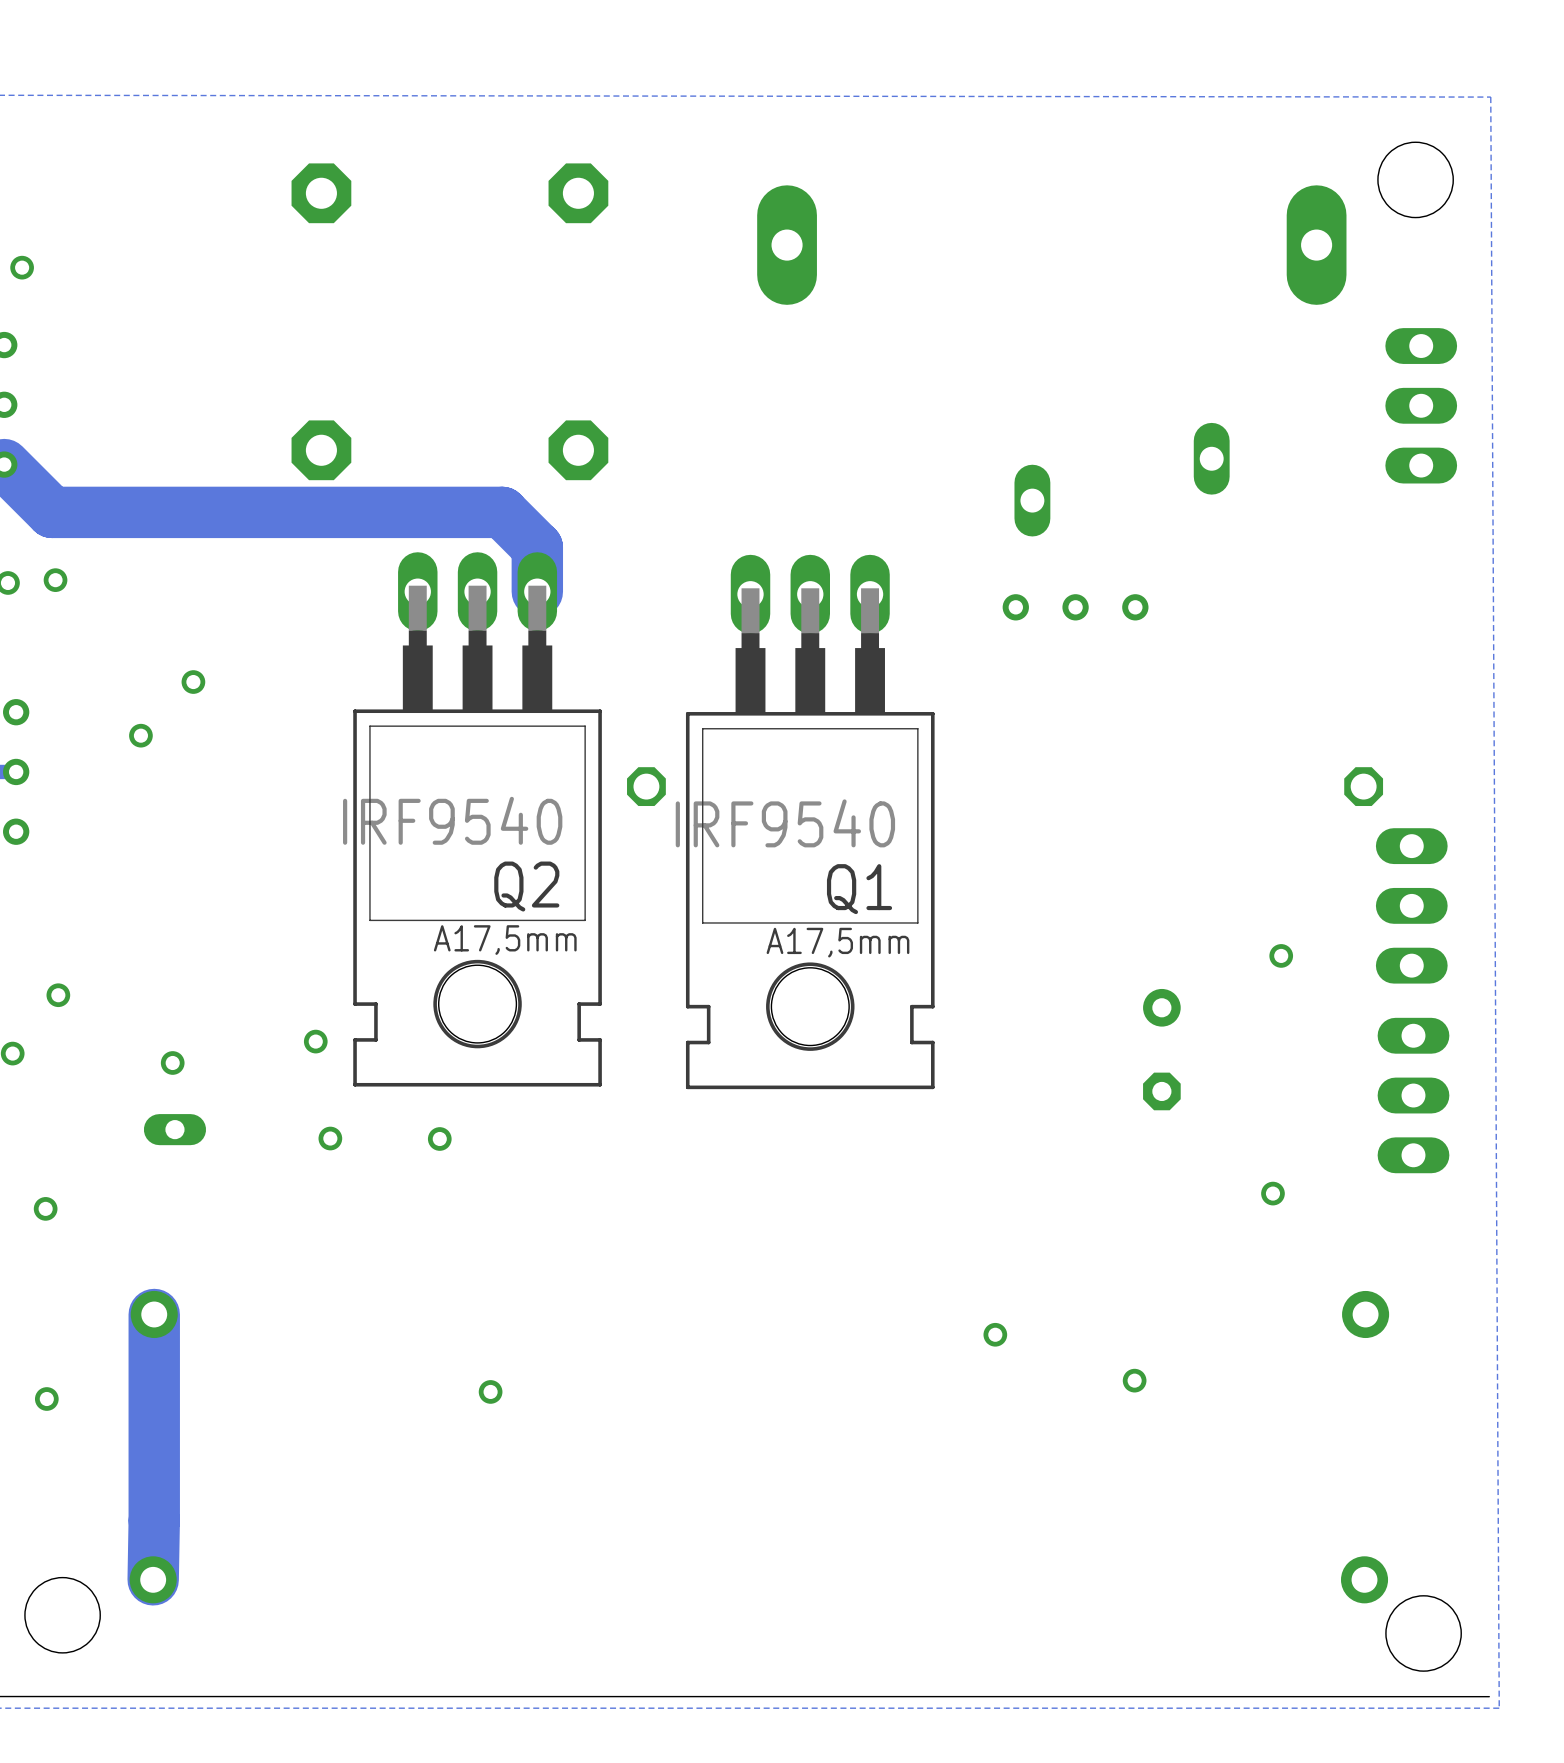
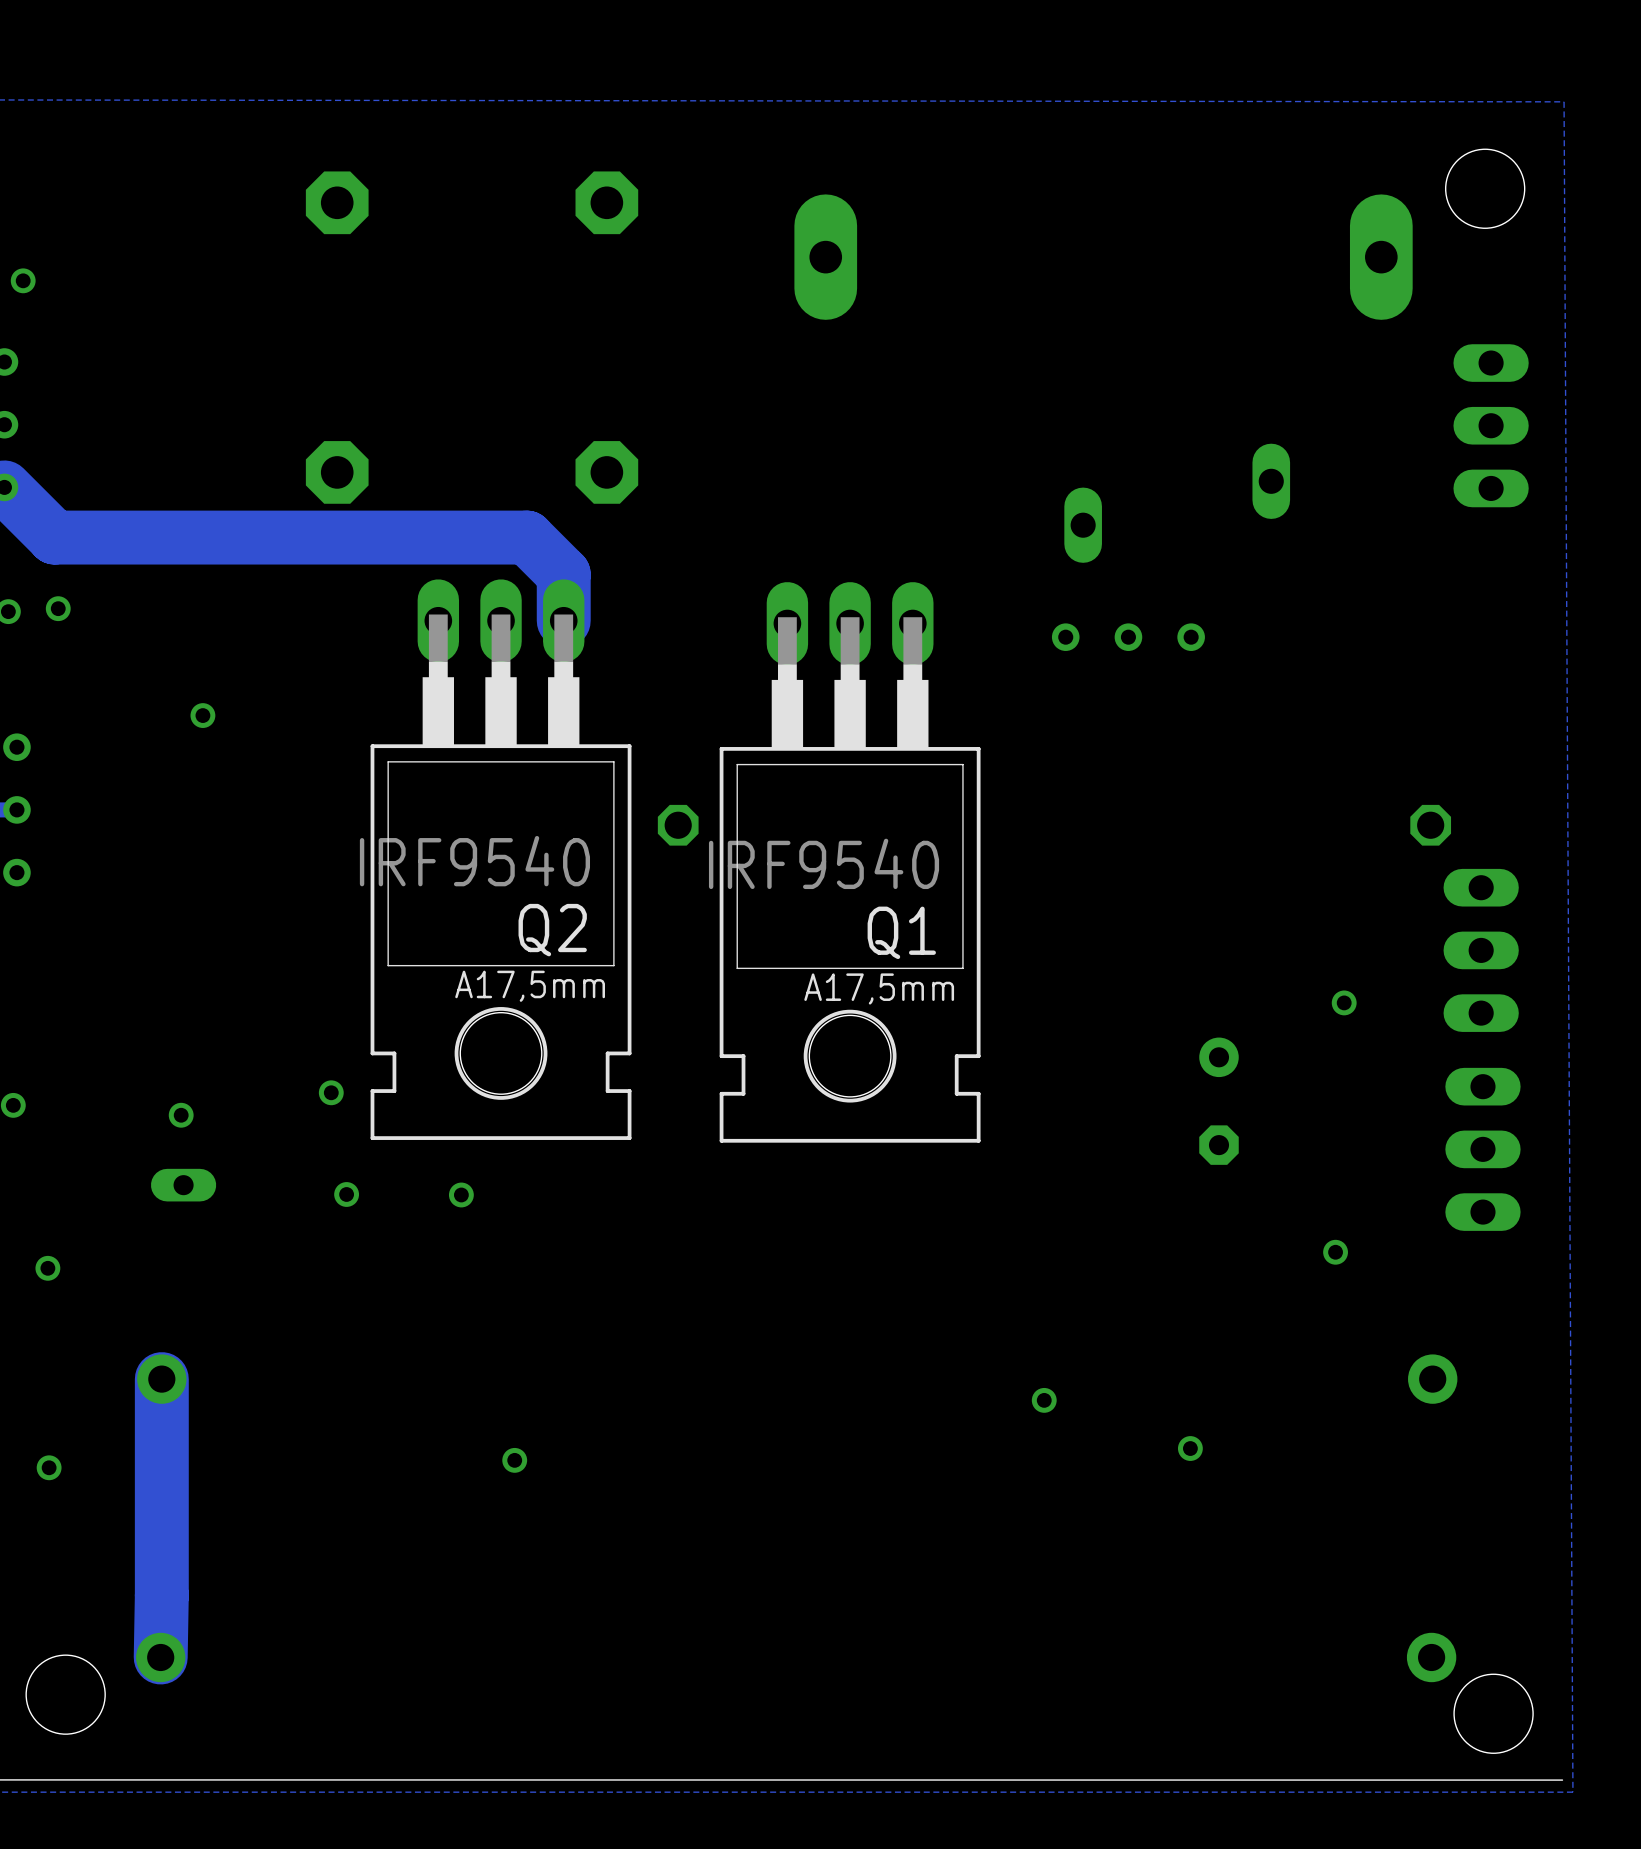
via: (140, 735) -> none
via: (58, 995) -> none

